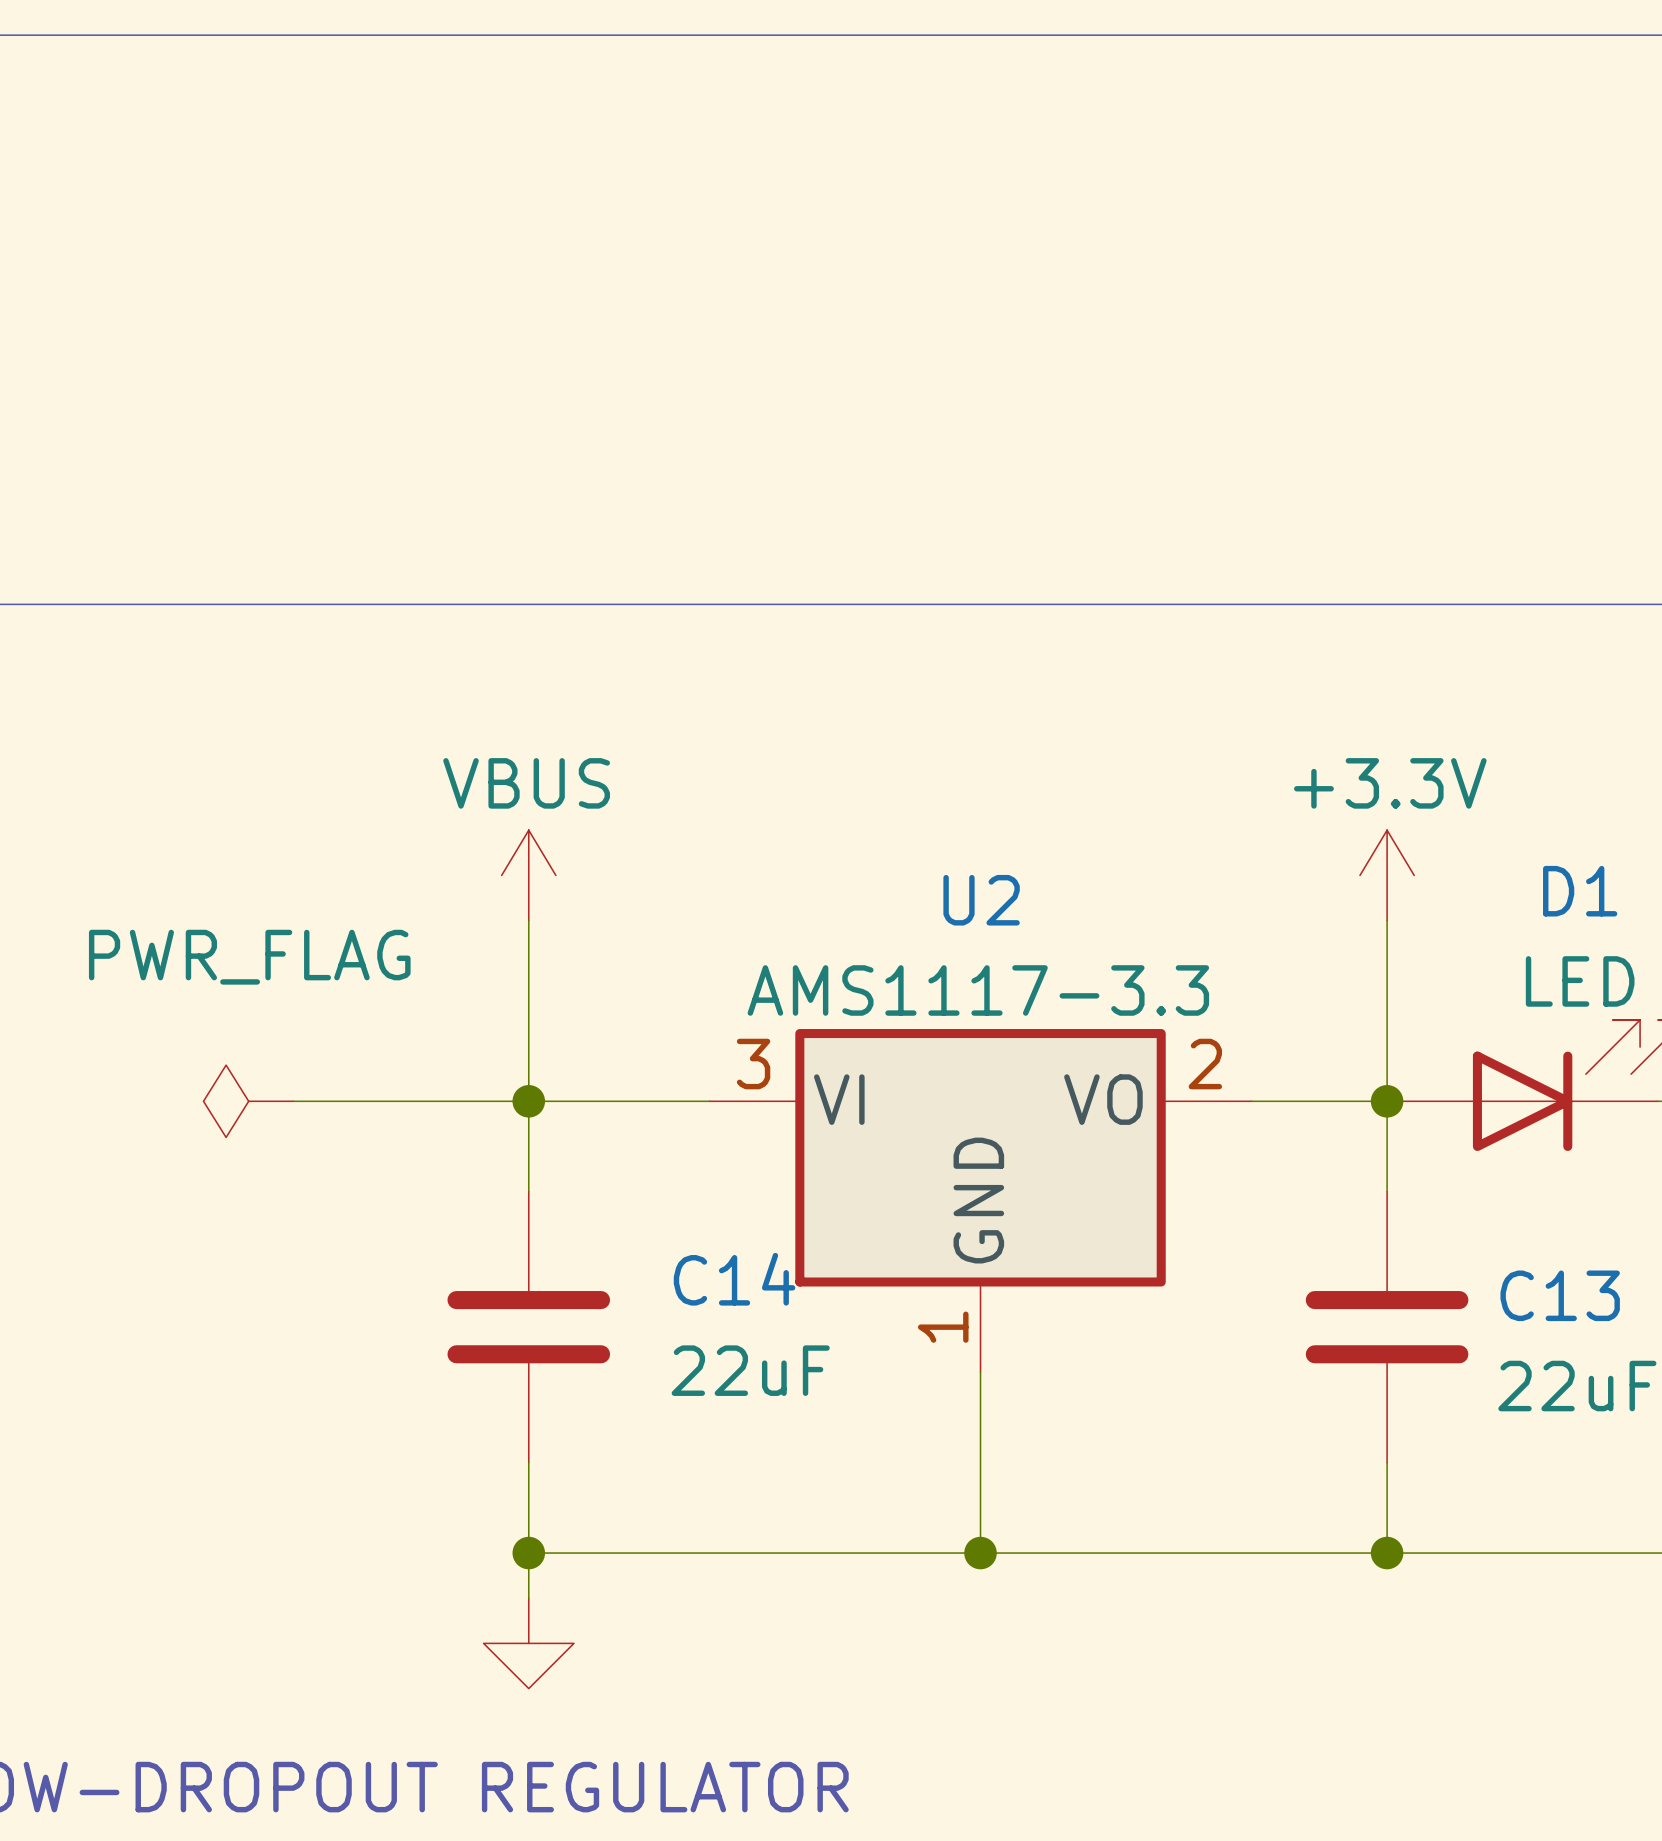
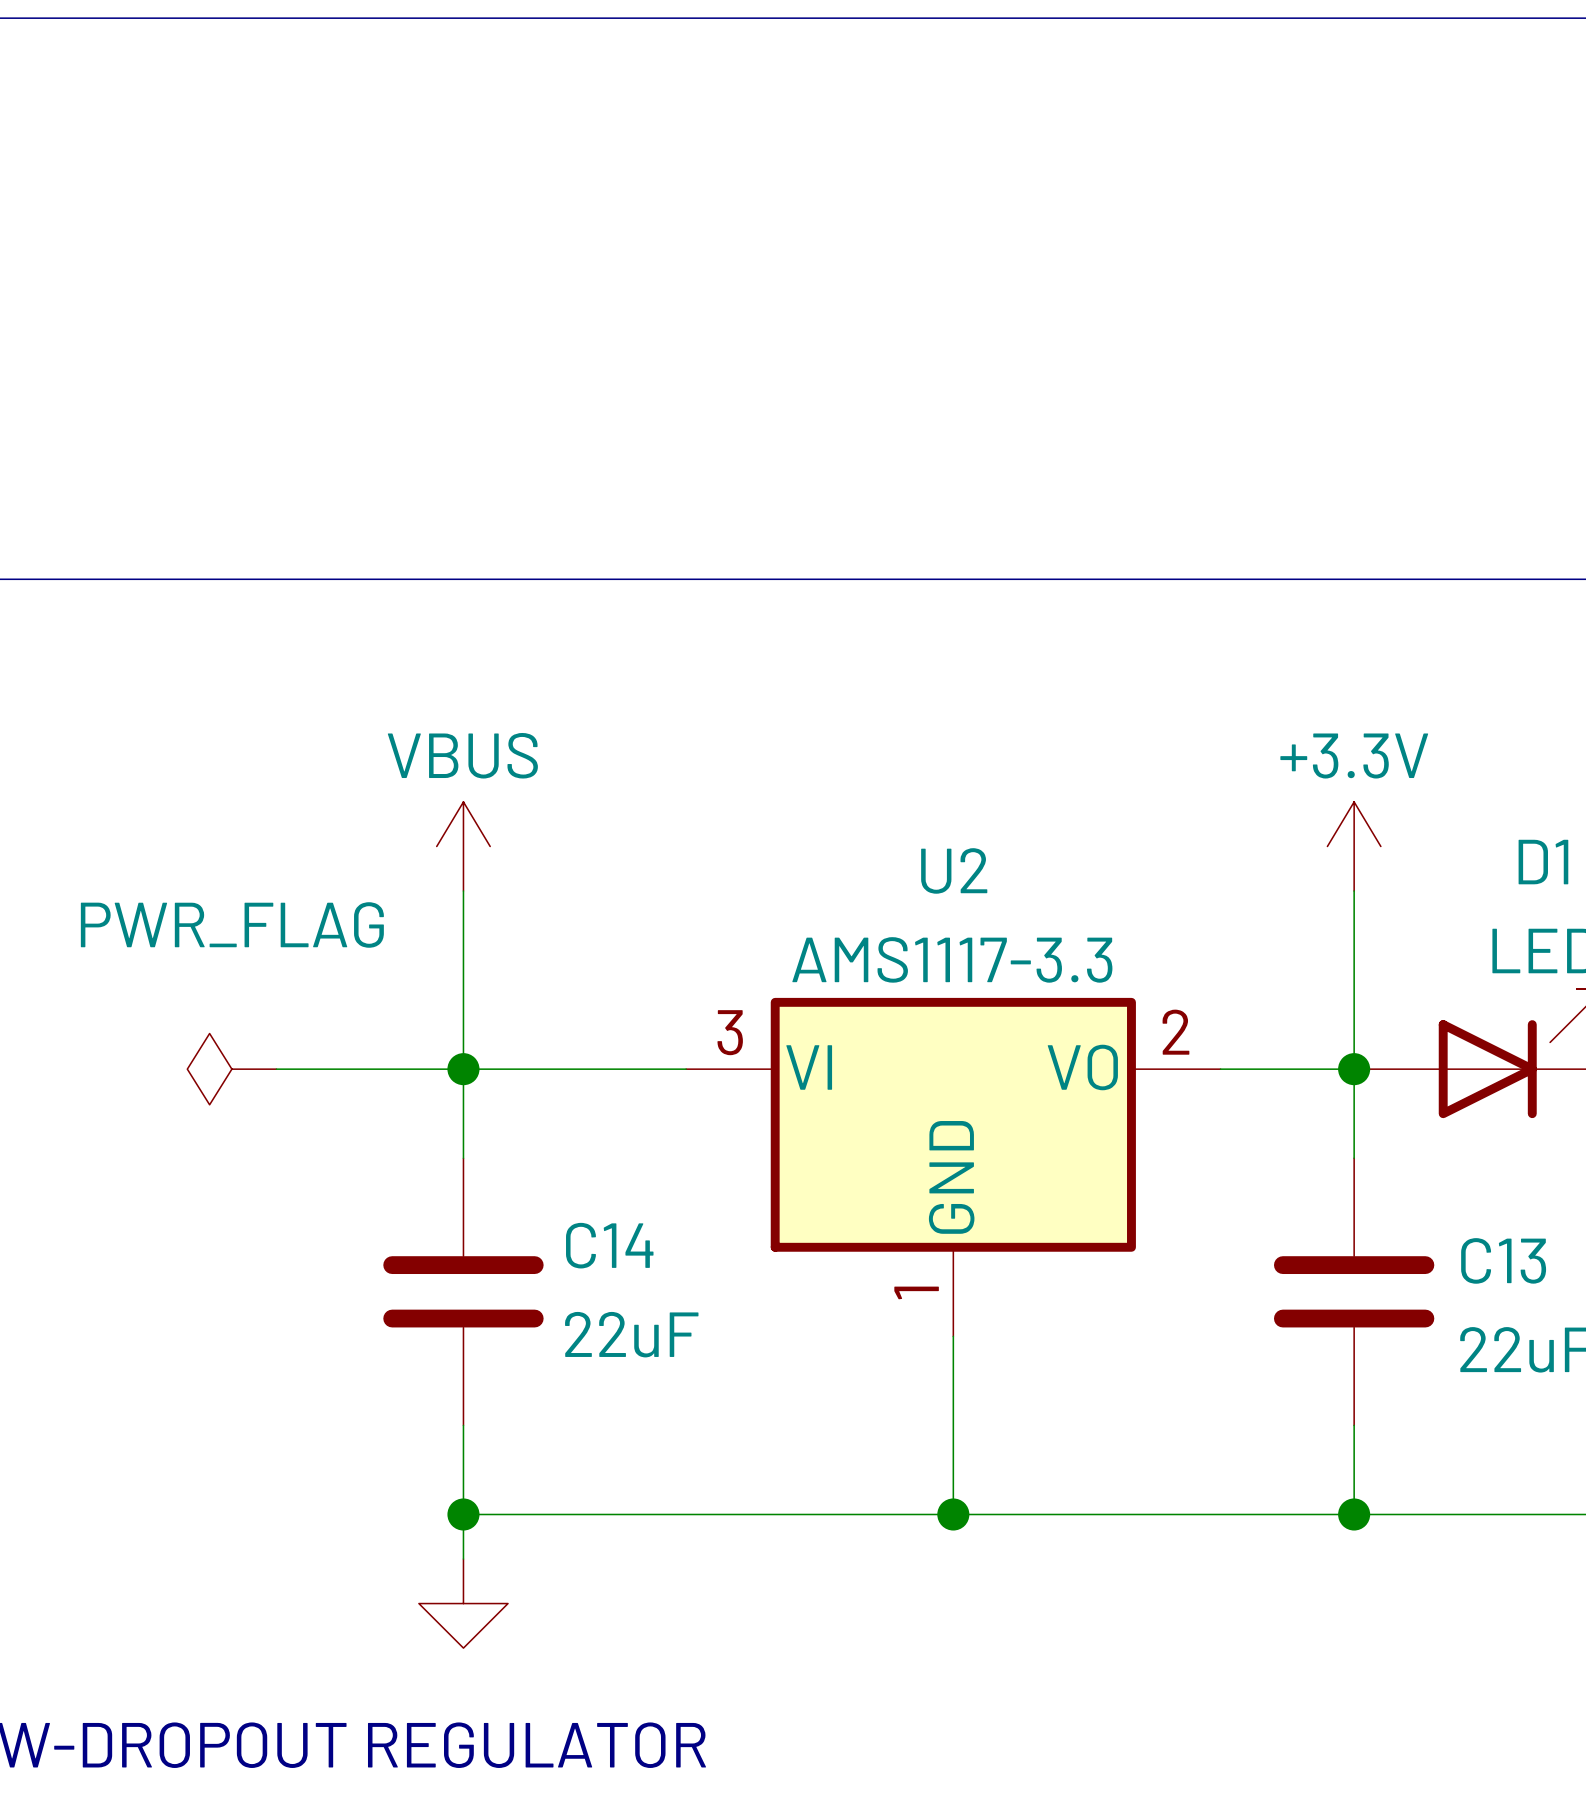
power symbol position: VBUS (528, 875) -> VBUS (463, 846)
wire: (528, 920) (528, 1191) -> (463, 891) (463, 1158)
junction position: (528, 1101) -> (463, 1069)
C14 name position: C14 (734, 1279) -> C14 (609, 1245)
C14 position: (528, 1327) -> (463, 1291)
C14 value position: 22uF (750, 1370) -> 22uF (631, 1334)
wire: (528, 1462) (528, 1598) -> (463, 1425) (463, 1559)
wire: none -> (463, 1514) (508, 1514)
junction position: (528, 1553) -> (463, 1514)
power symbol position: (528, 1643) -> (463, 1603)

